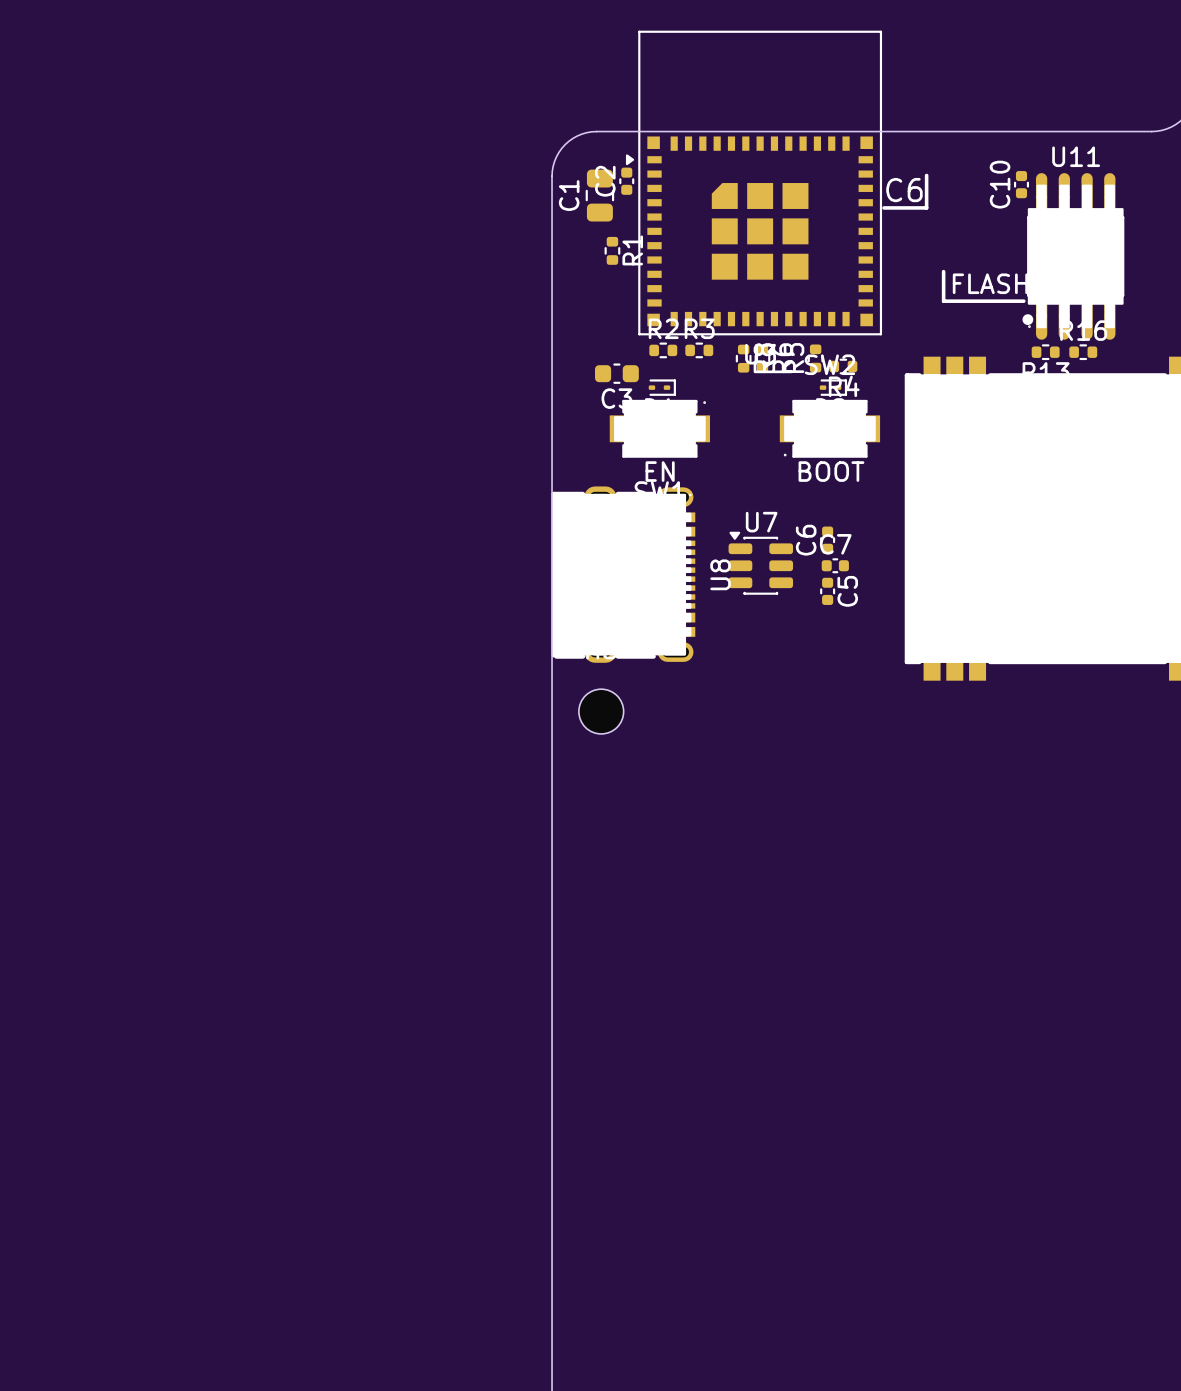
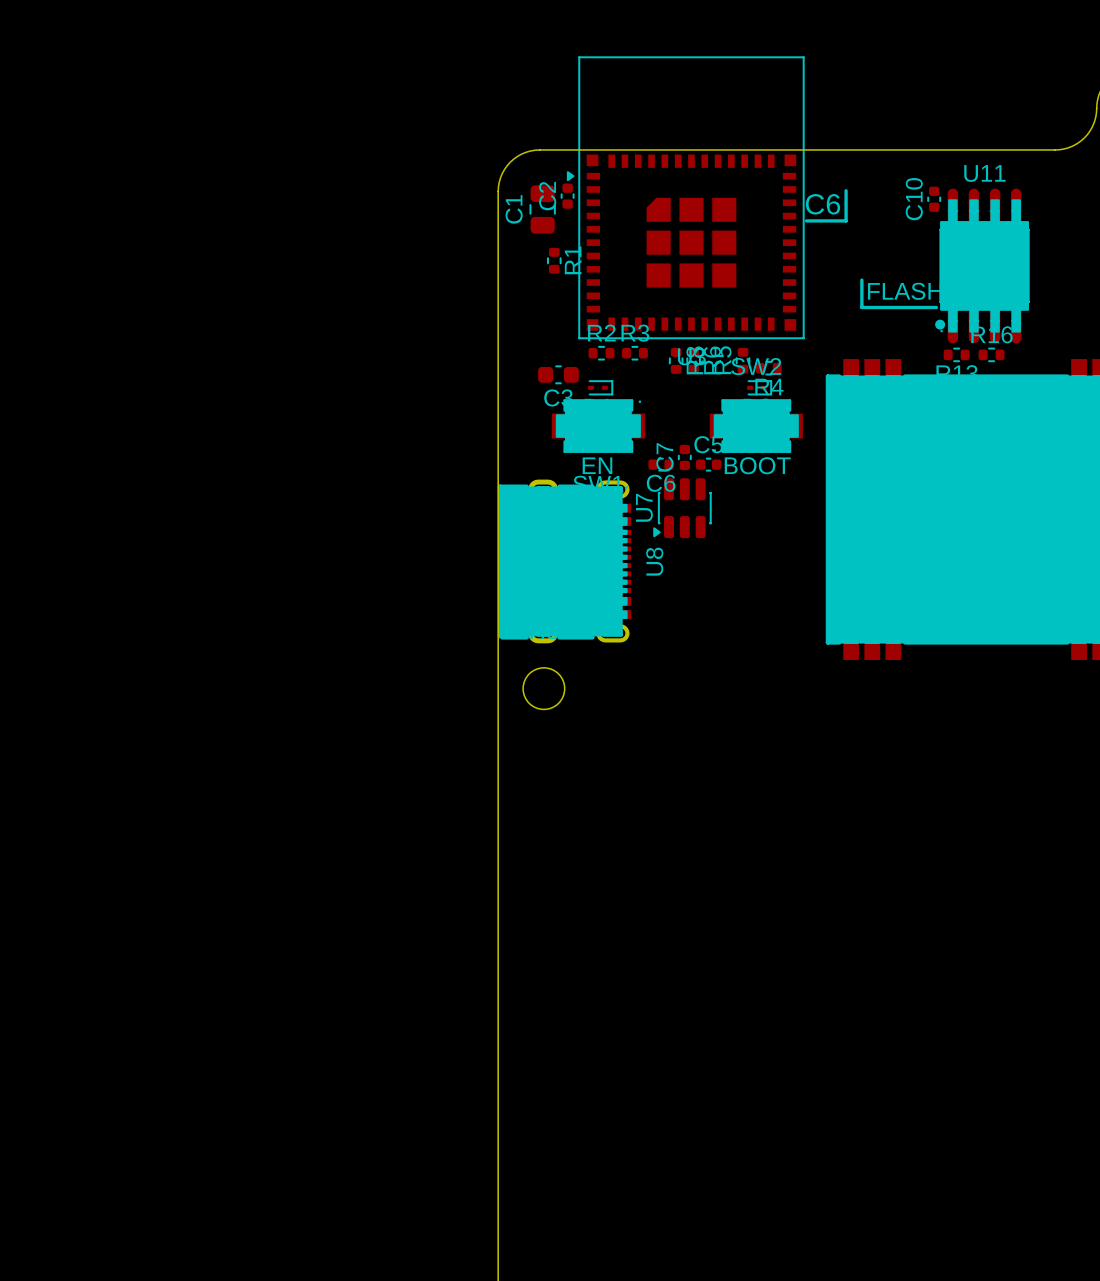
C6 rotation: 0° (827, 540) -> 90° clockwise (661, 464)
C6 position: (827, 540) -> (661, 464)
U7 rotation: 0° (760, 563) -> 90° counterclockwise (682, 508)
U7 position: (760, 563) -> (682, 508)
C7 rotation: 0° (835, 565) -> 90° clockwise (684, 457)
C7 position: (835, 565) -> (684, 457)
C5 rotation: 0° (827, 591) -> 90° clockwise (708, 464)
C5 position: (827, 591) -> (708, 464)

